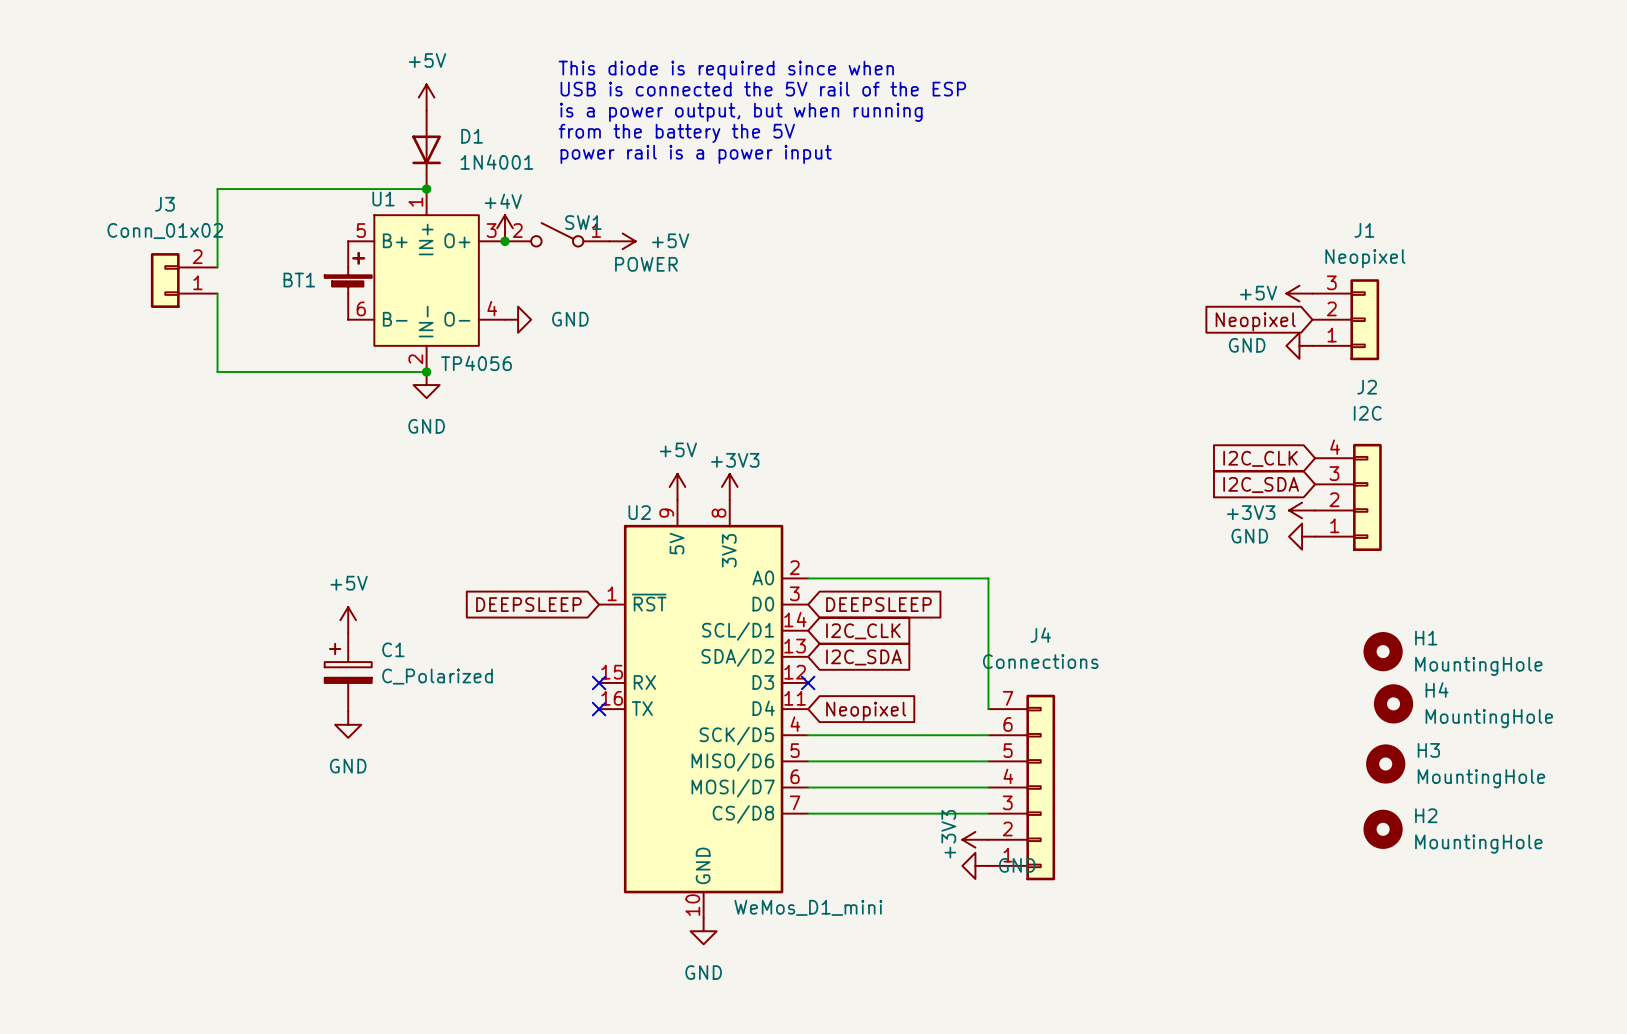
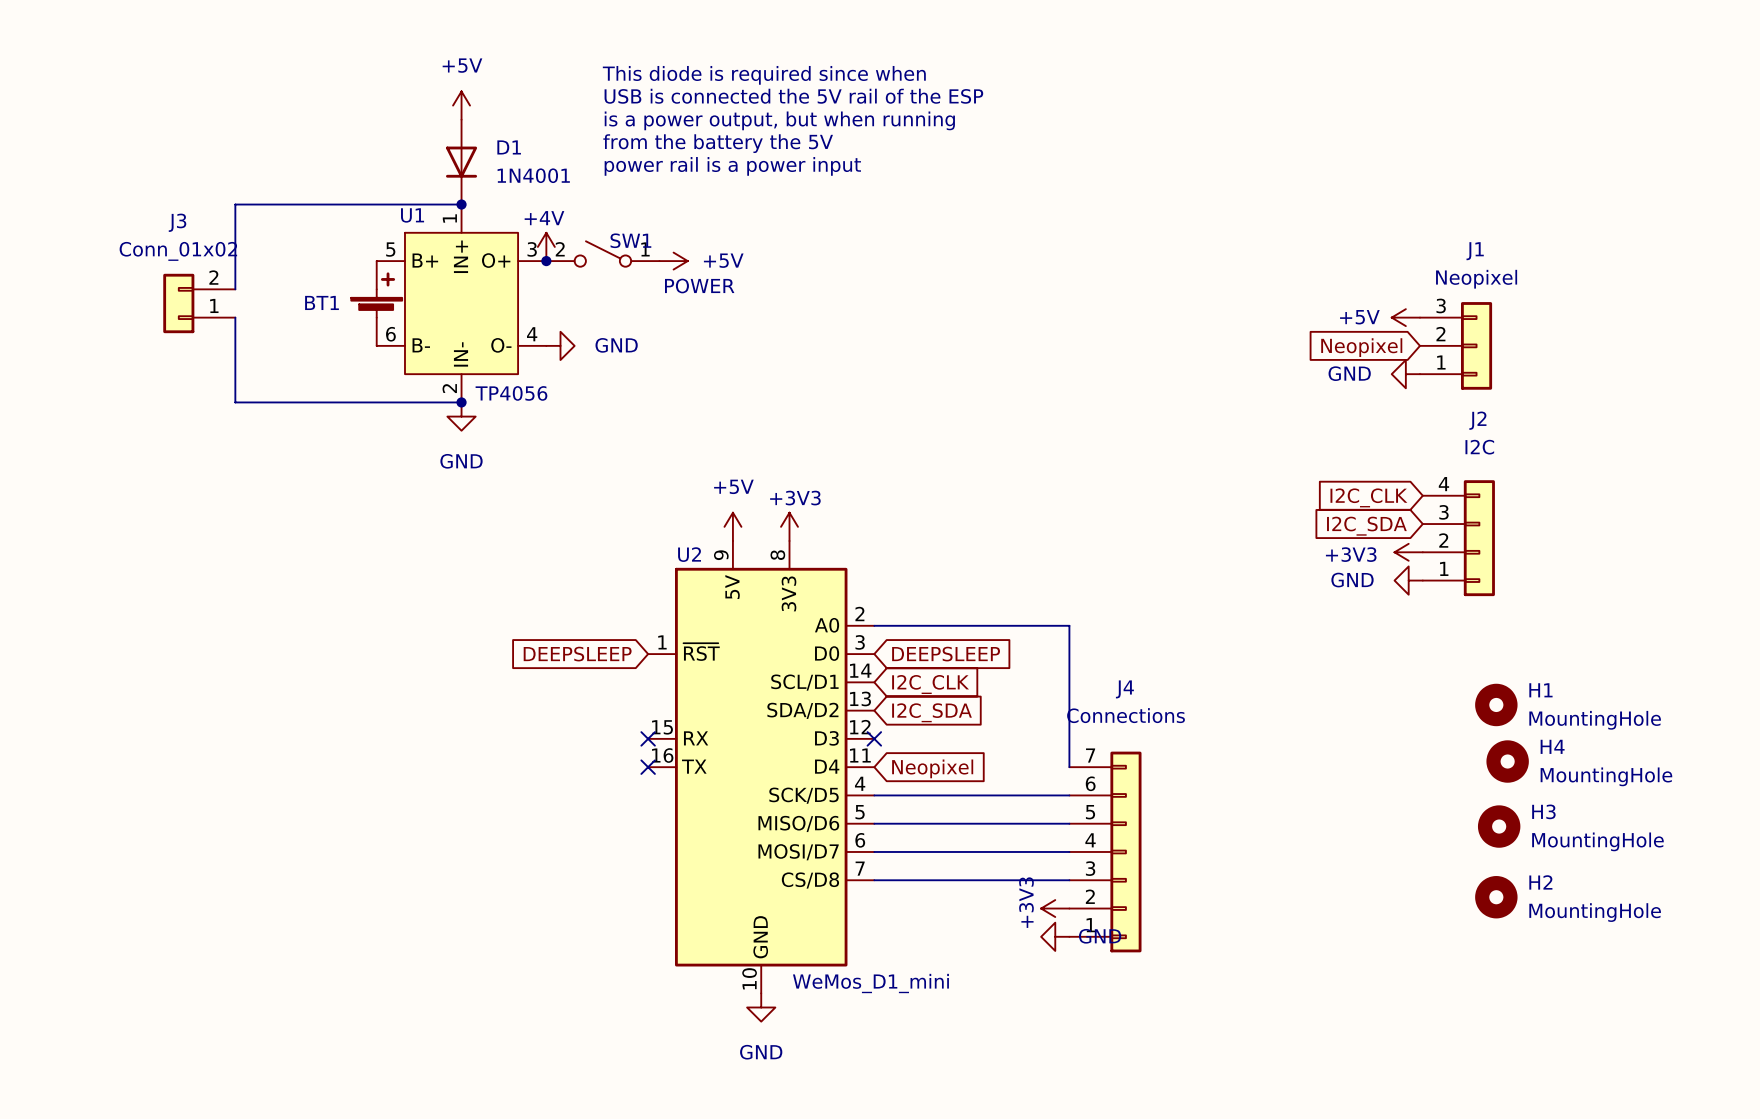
power symbol: +5V (348, 620) -> none
C1: C_Polarized (348, 672) -> none
power symbol: GND (348, 724) -> none

